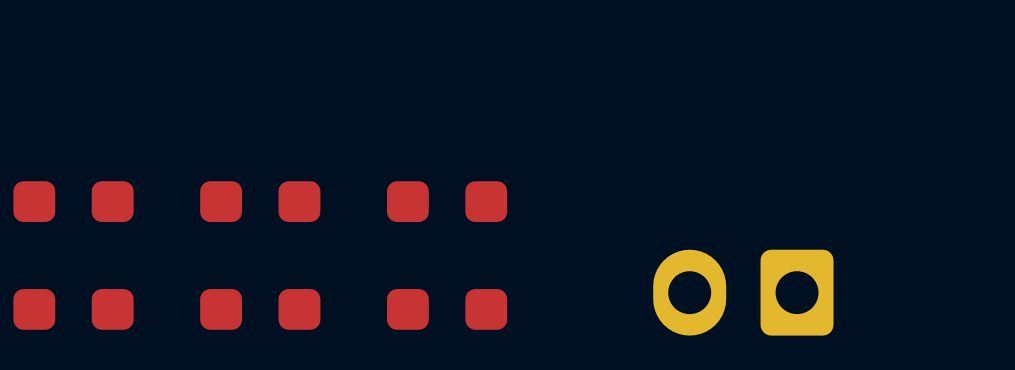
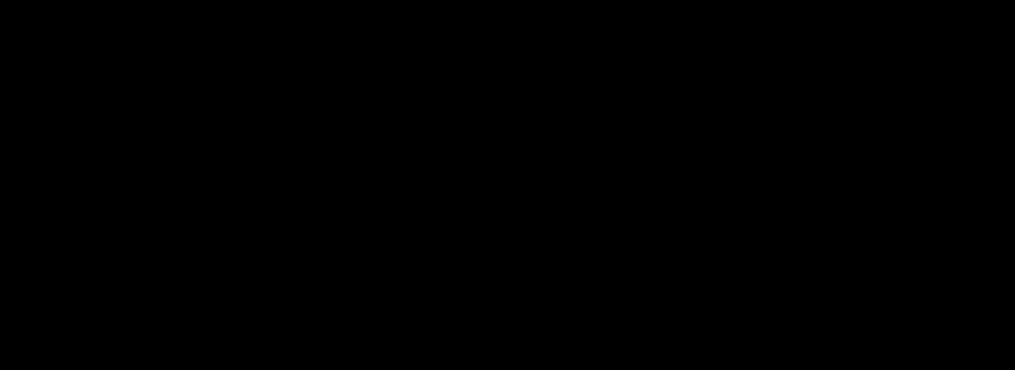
part: (73, 201) -> none
part: (260, 201) -> none
part: (447, 201) -> none
part: (743, 292) -> none
part: (73, 309) -> none
part: (260, 309) -> none
part: (447, 309) -> none

